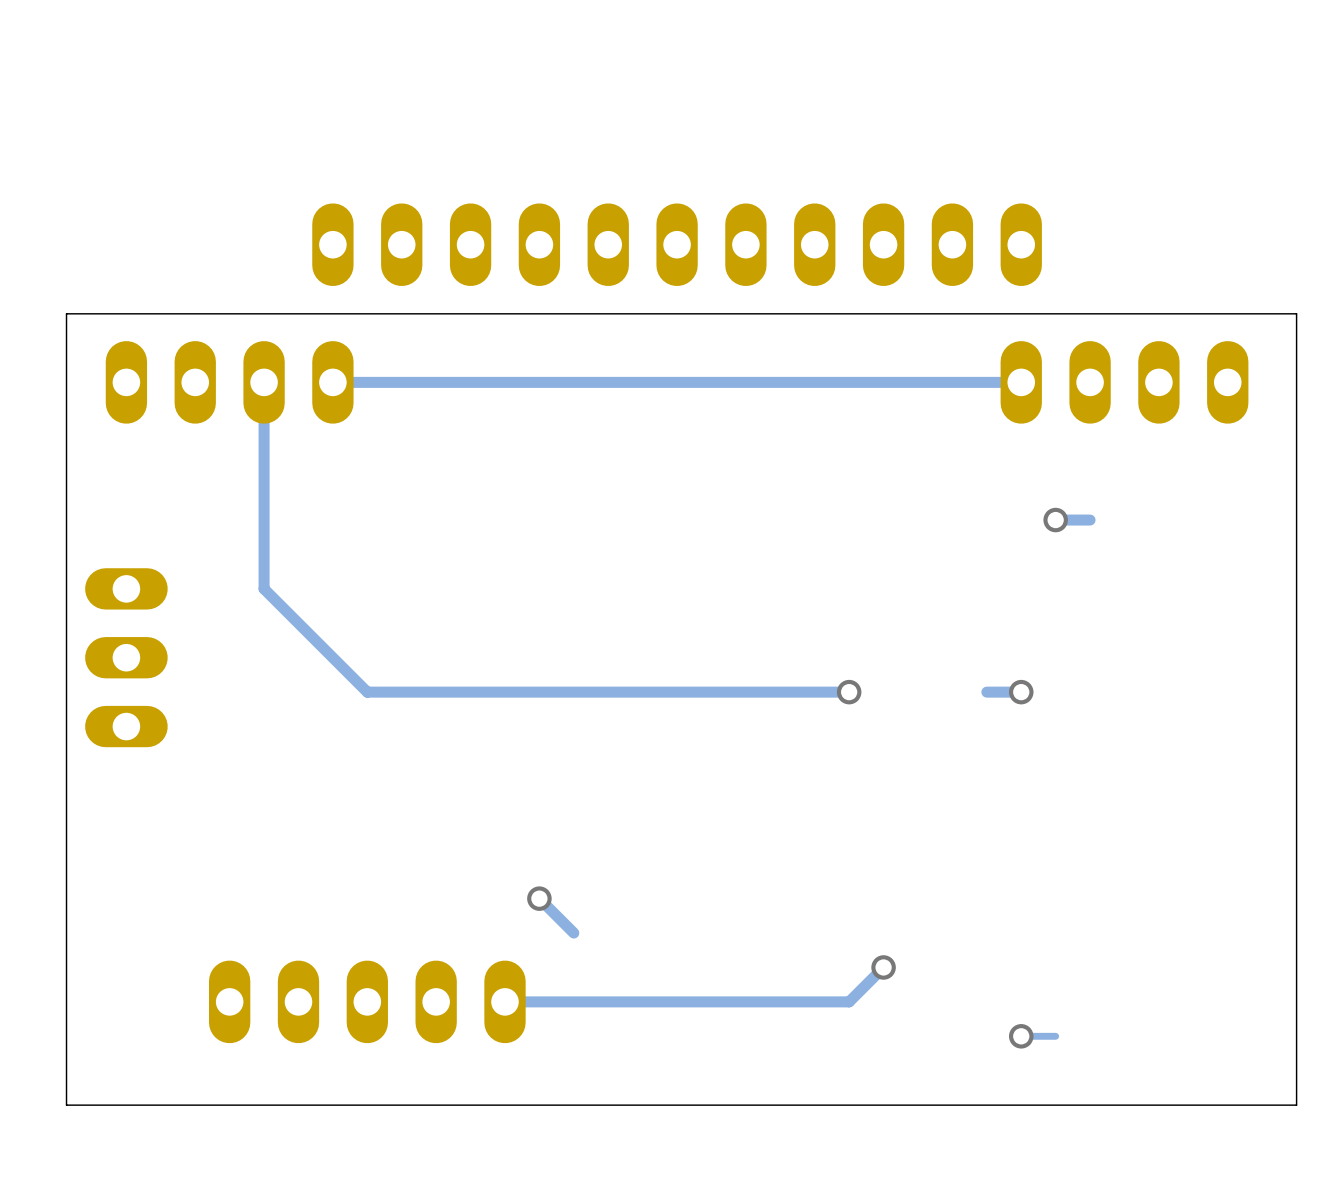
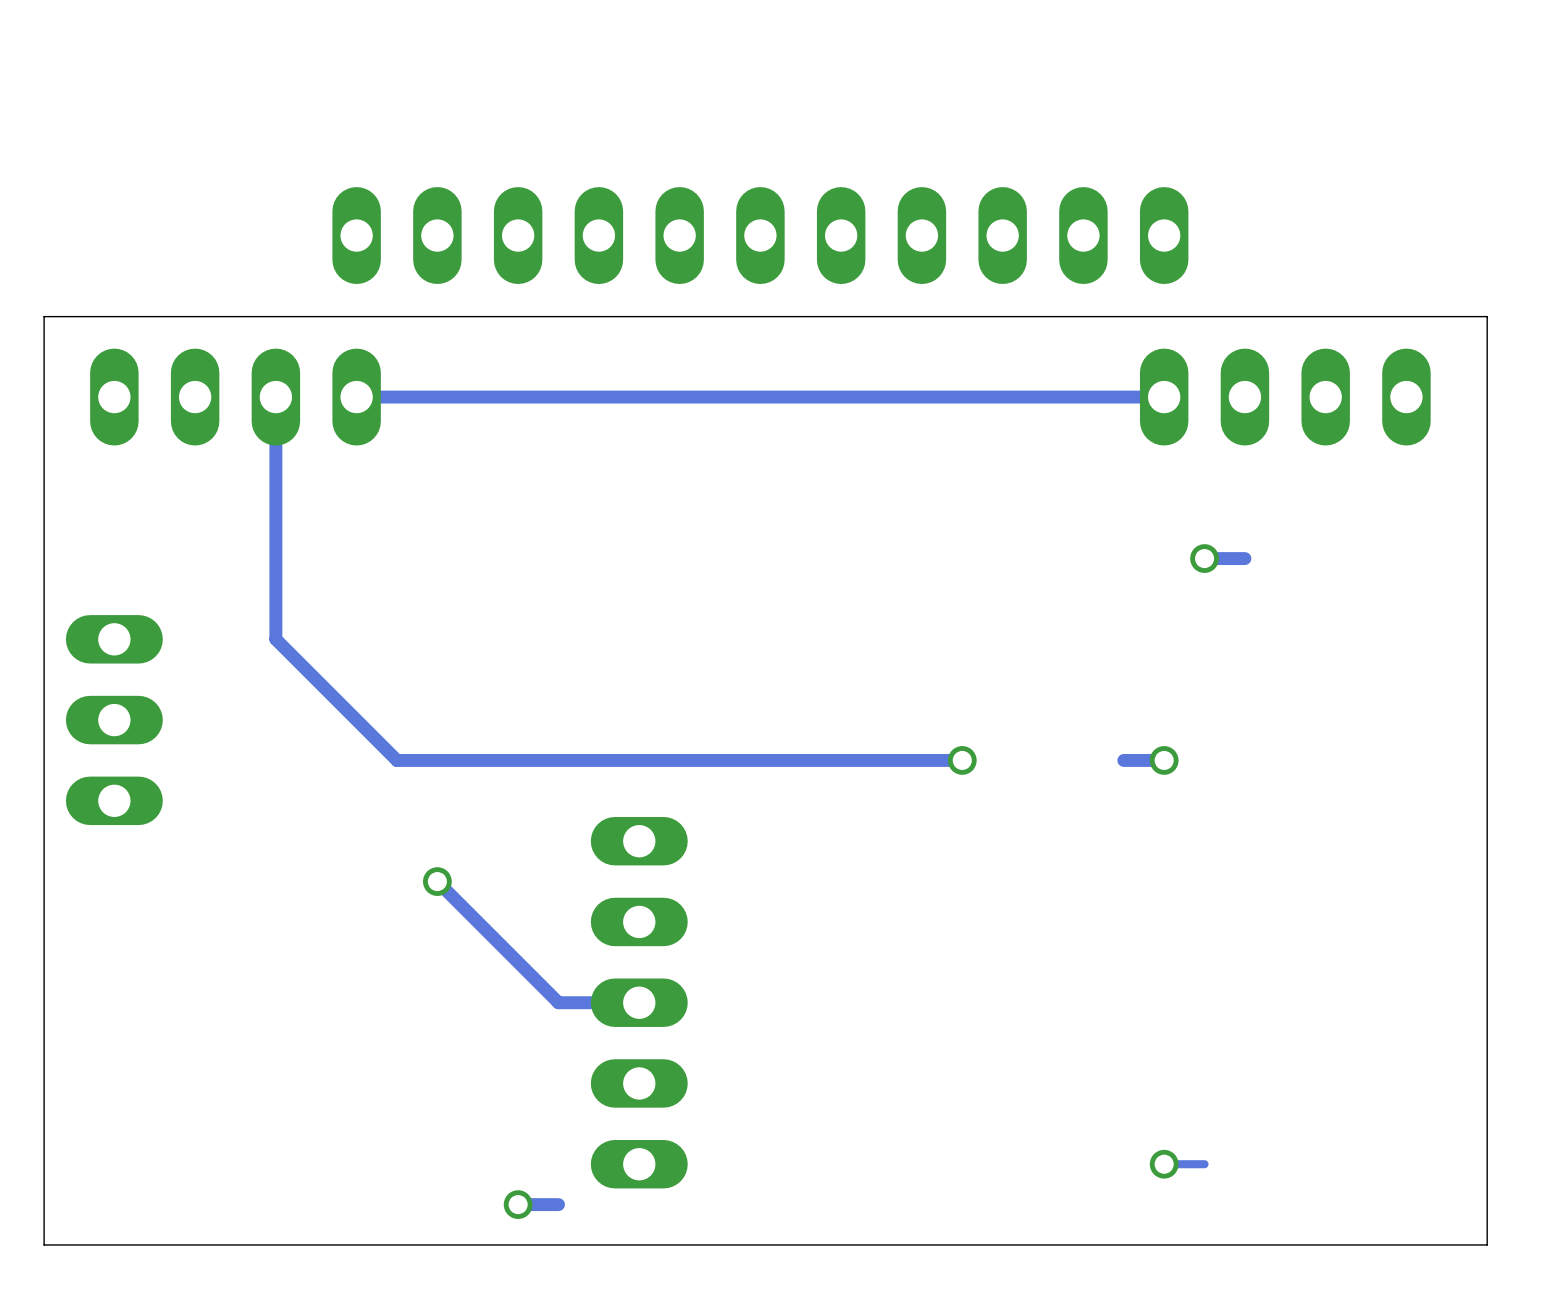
track: none -> (437, 881) (558, 1002) (639, 1002)
via: none -> (437, 881)
track: (539, 898) (573, 933) -> none
via: (539, 898) -> none
track: (883, 967) (849, 1001) (504, 1001) -> none
via: (883, 967) -> none
part rotation: 0° (367, 1001) -> 90° clockwise (639, 1002)
part position: (367, 1001) -> (639, 1002)
via: none -> (518, 1204)
track: none -> (558, 1204) (518, 1204)

